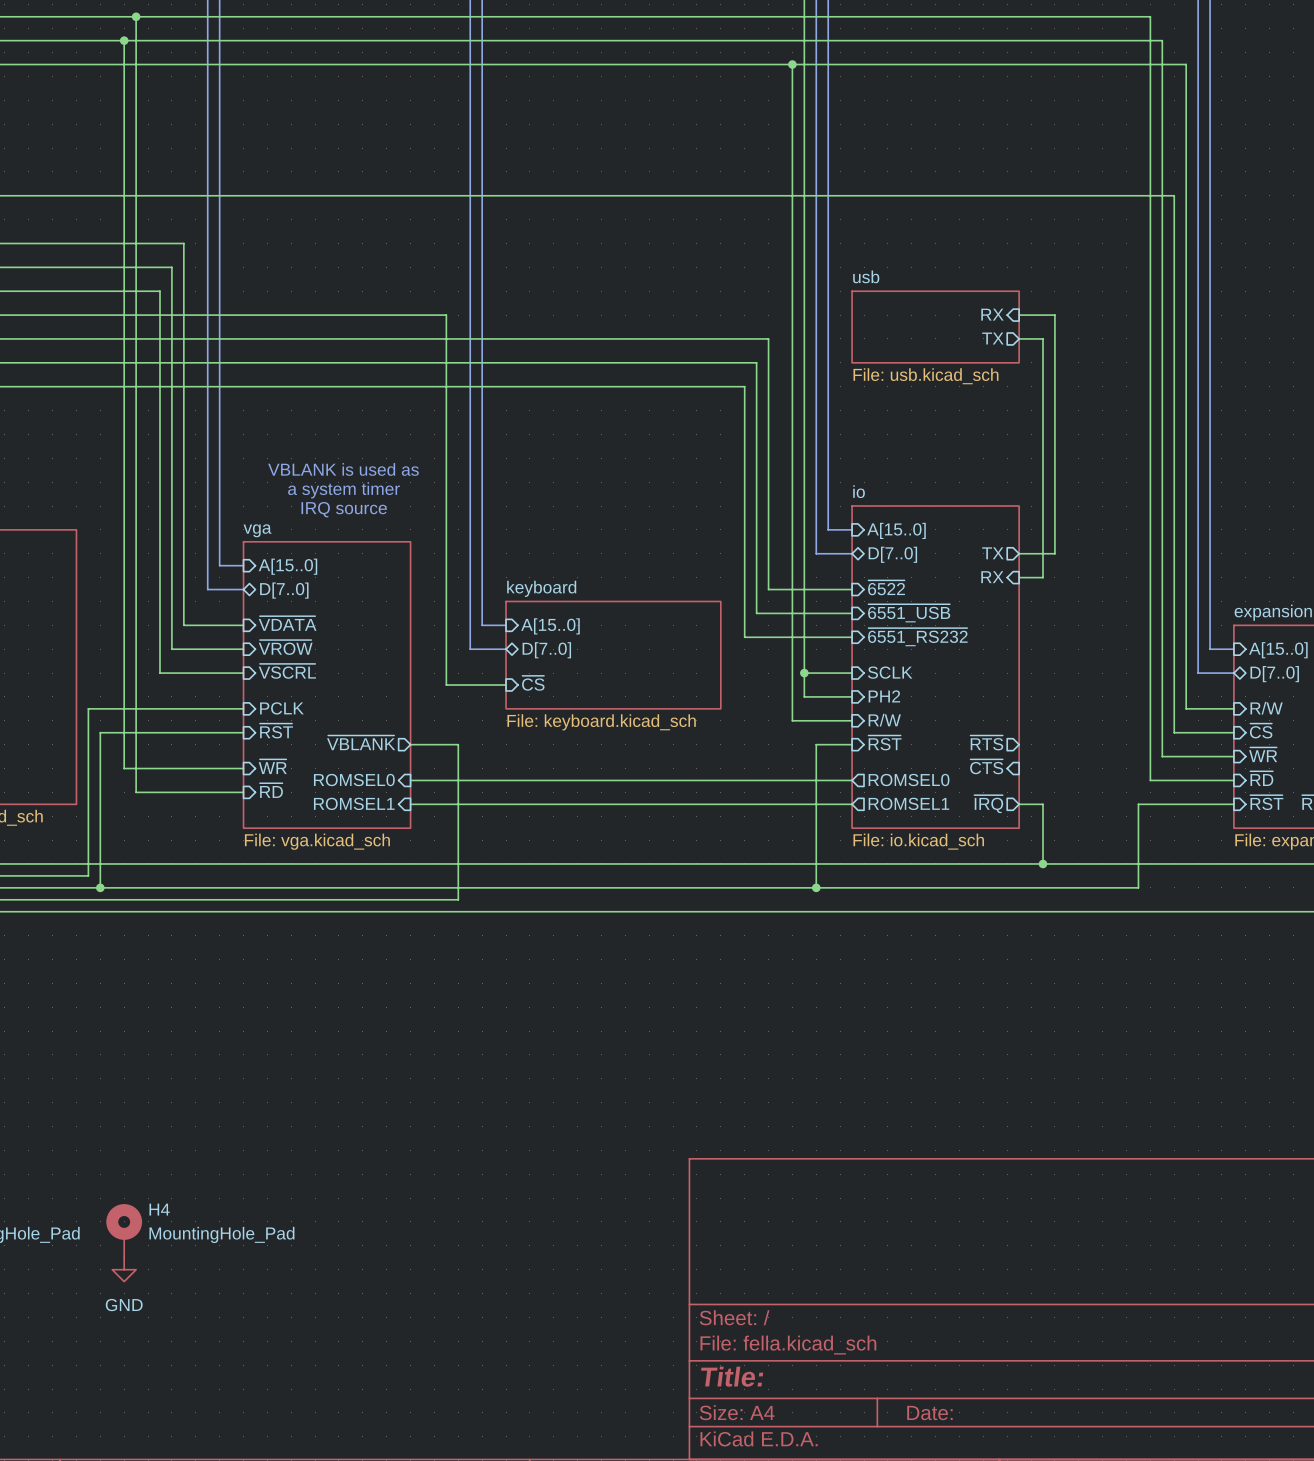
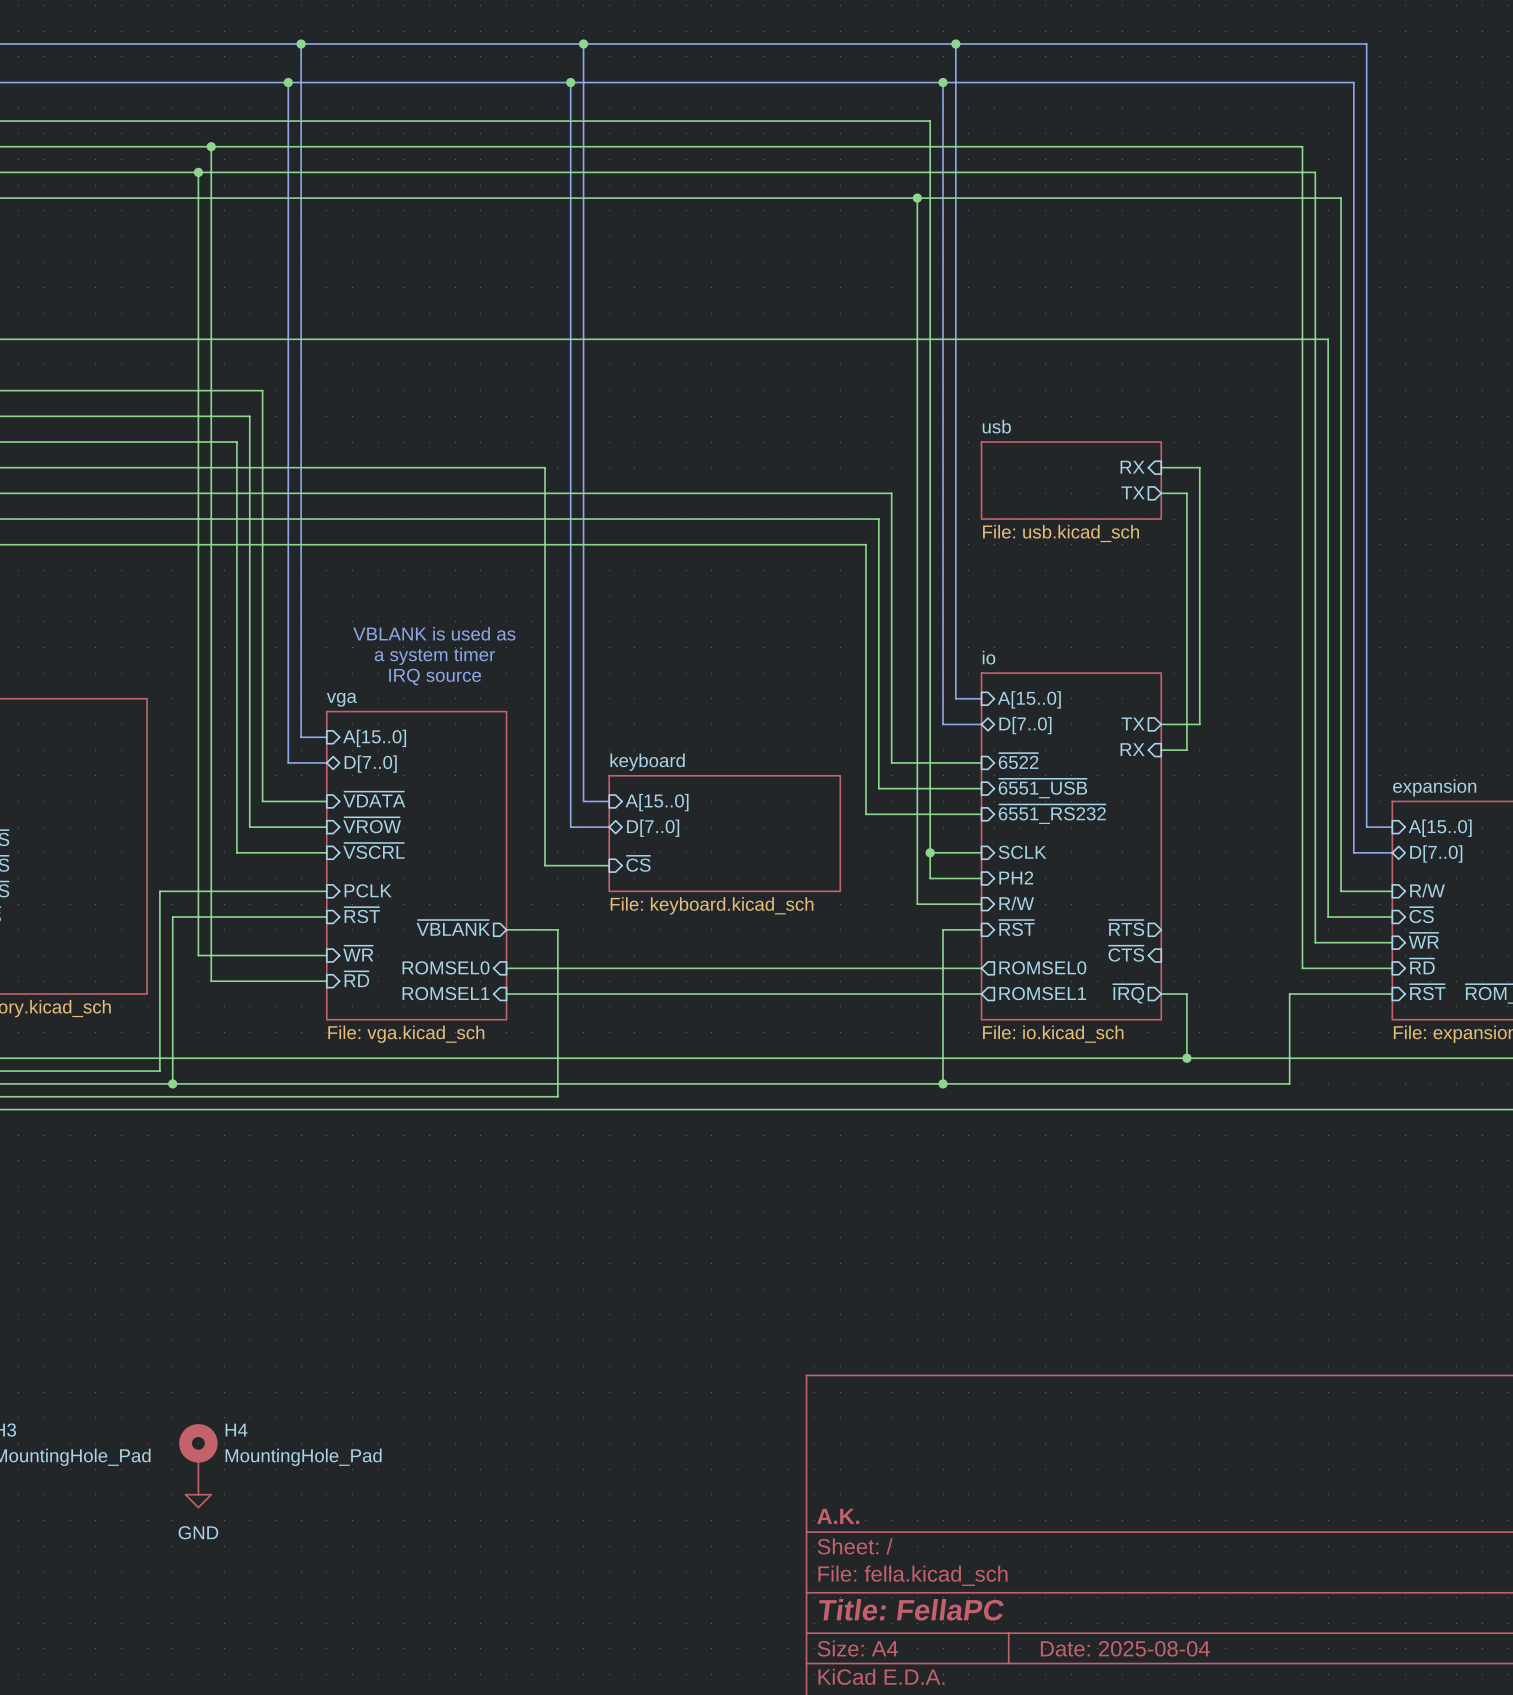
title block: none -> A.K. (838, 1516)
title block: Title: (732, 1376) -> Title: FellaPC (911, 1609)
title block: Date: (929, 1413) -> Date: 2025-08-04 (1125, 1648)

